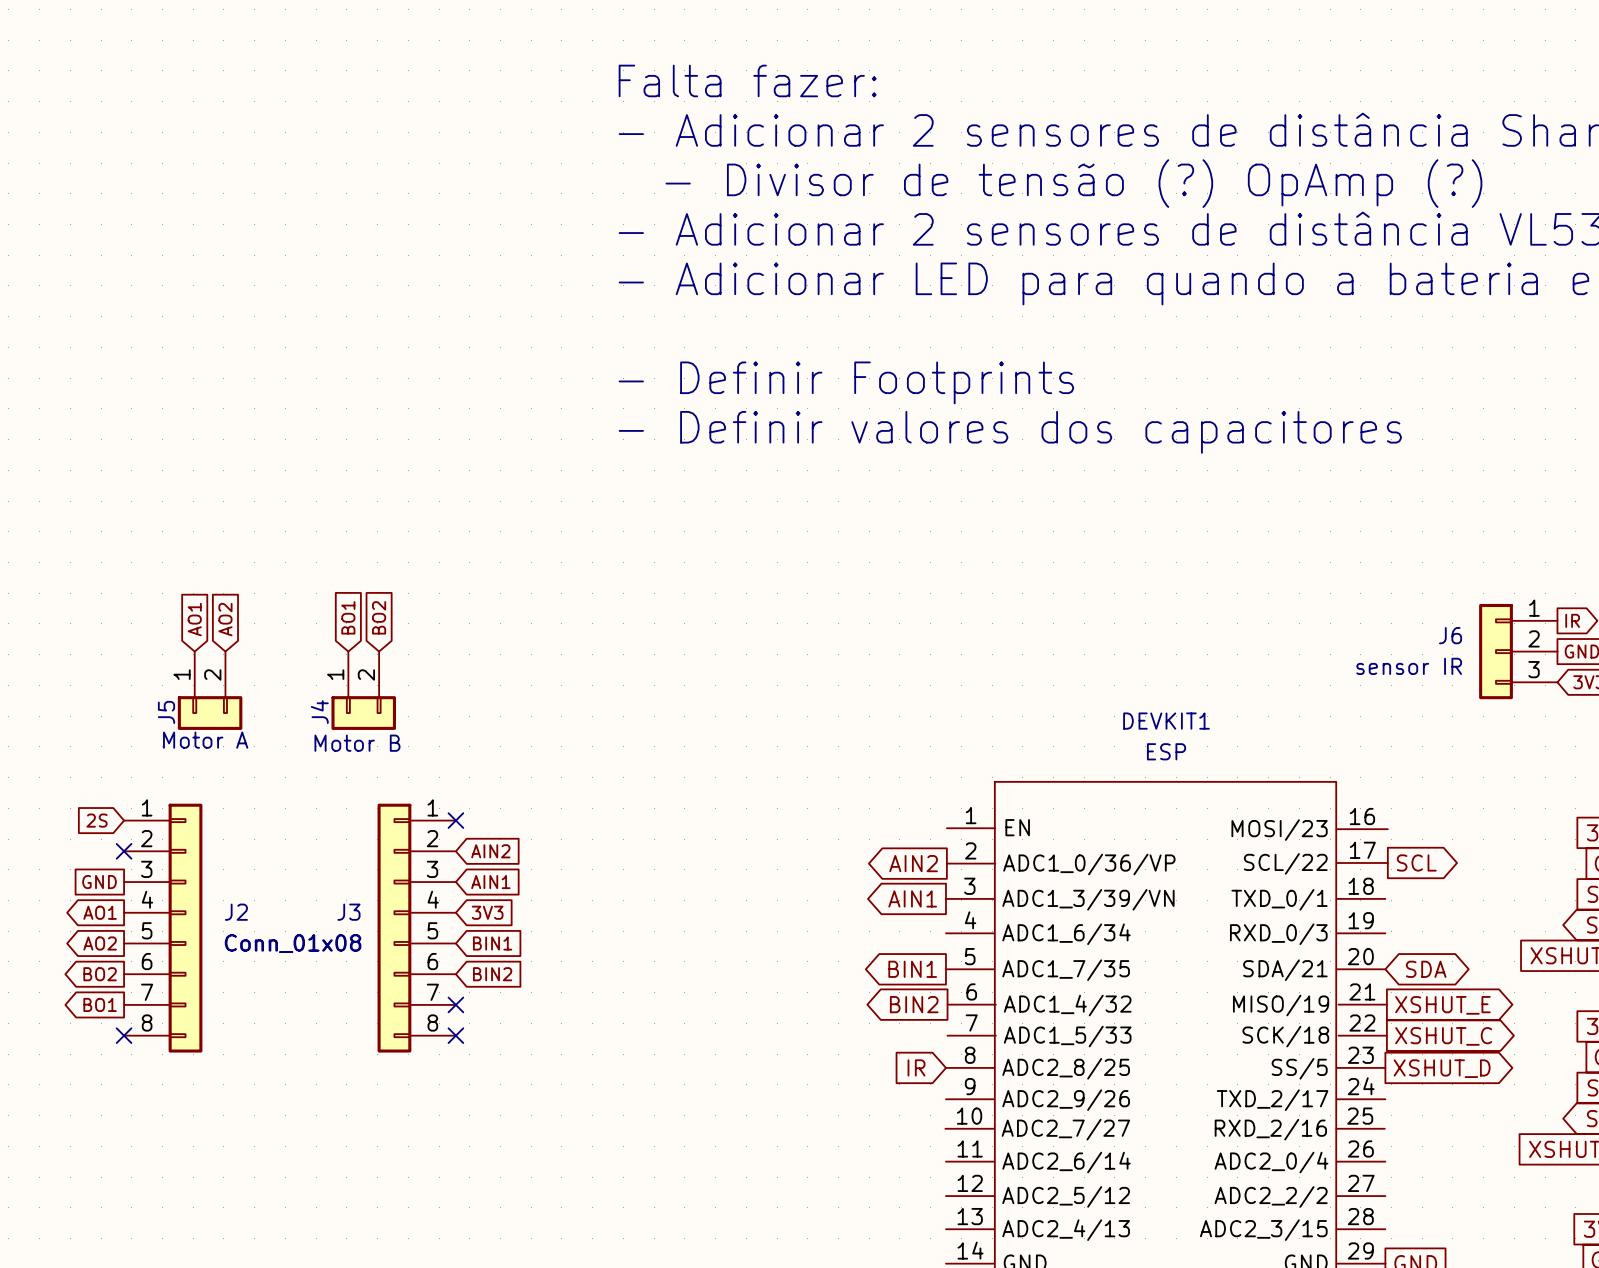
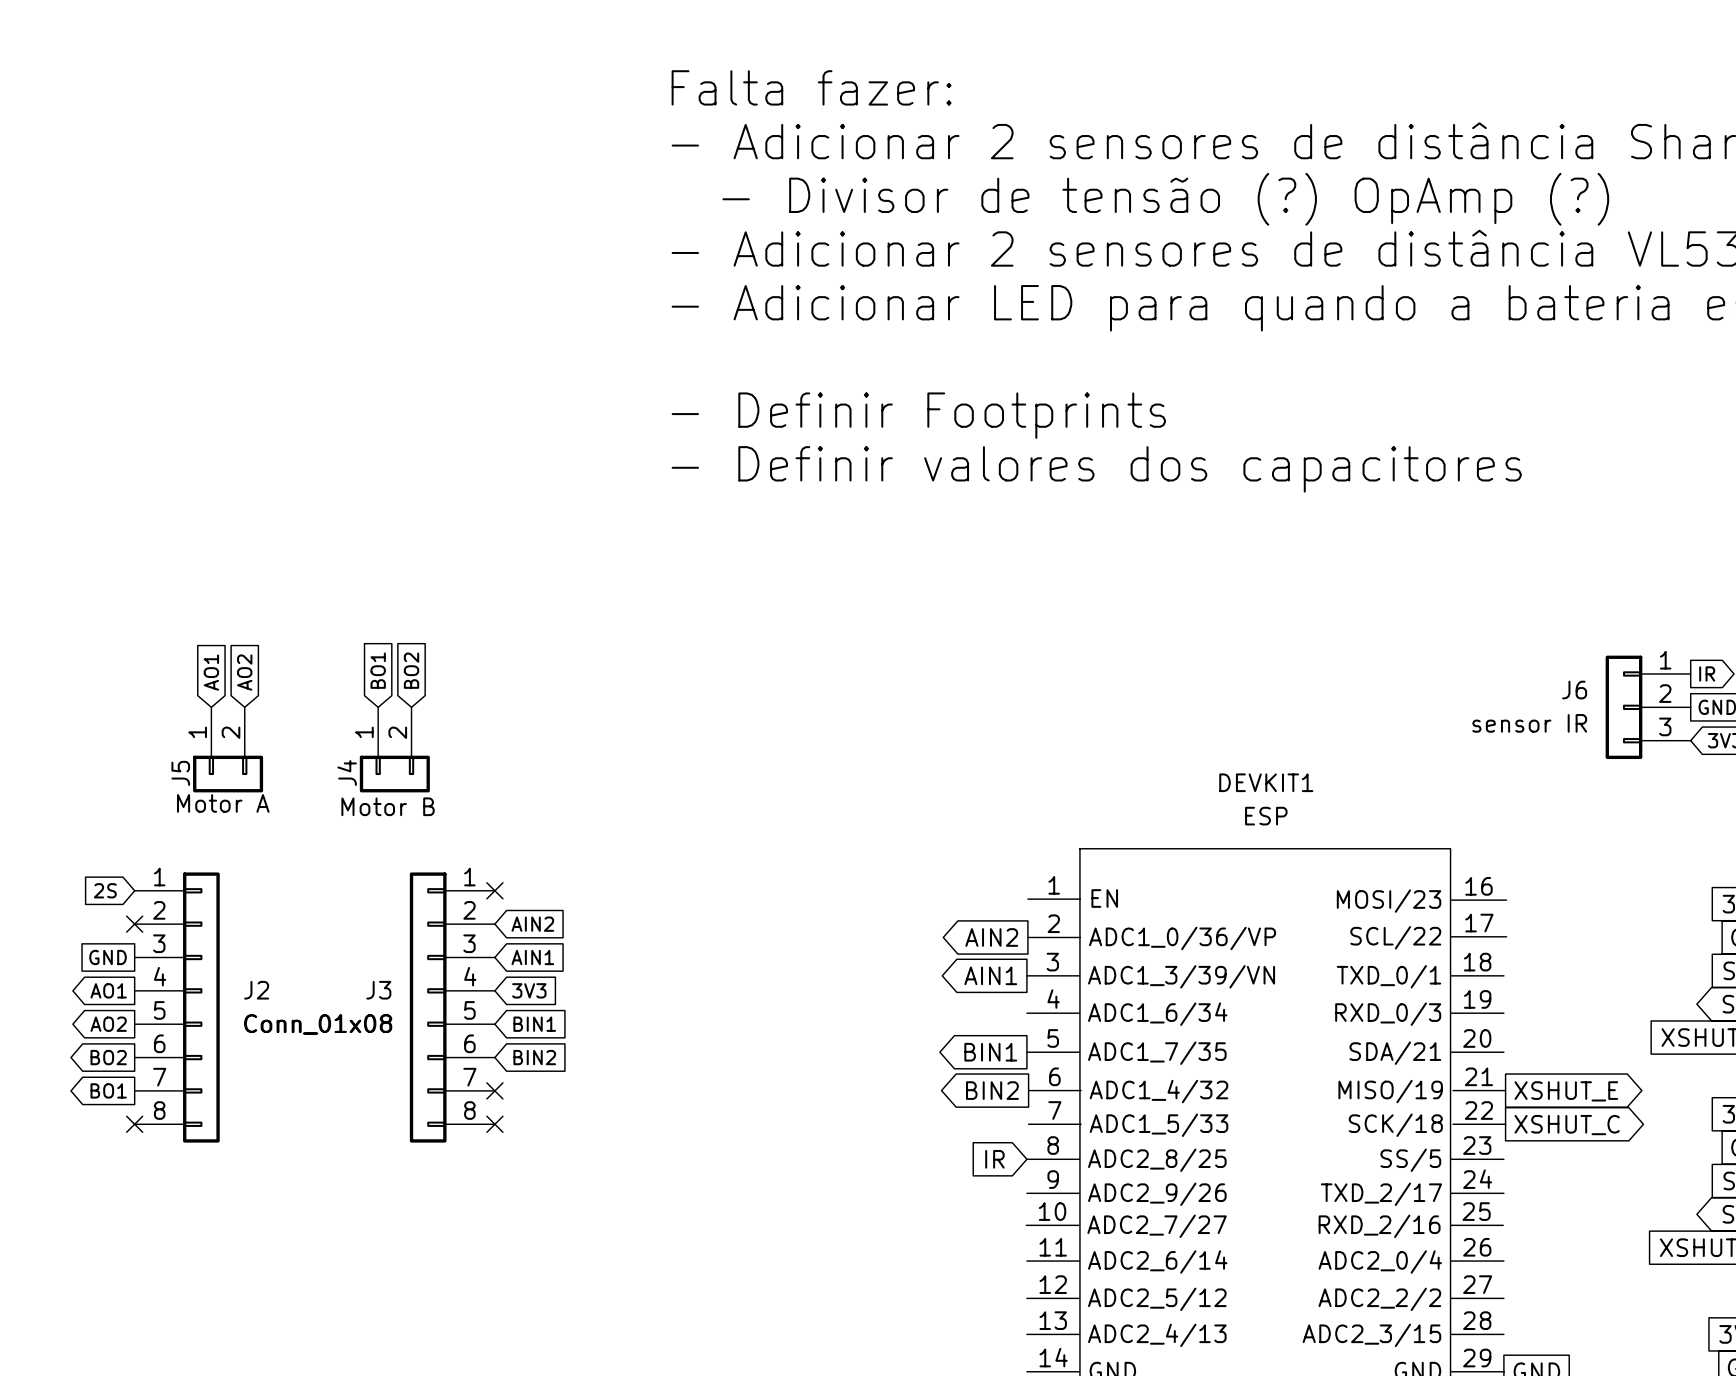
global label: SCL (1416, 862) -> none
global label: SDA (1426, 969) -> none
global label: XSHUT_D (1442, 1068) -> none

